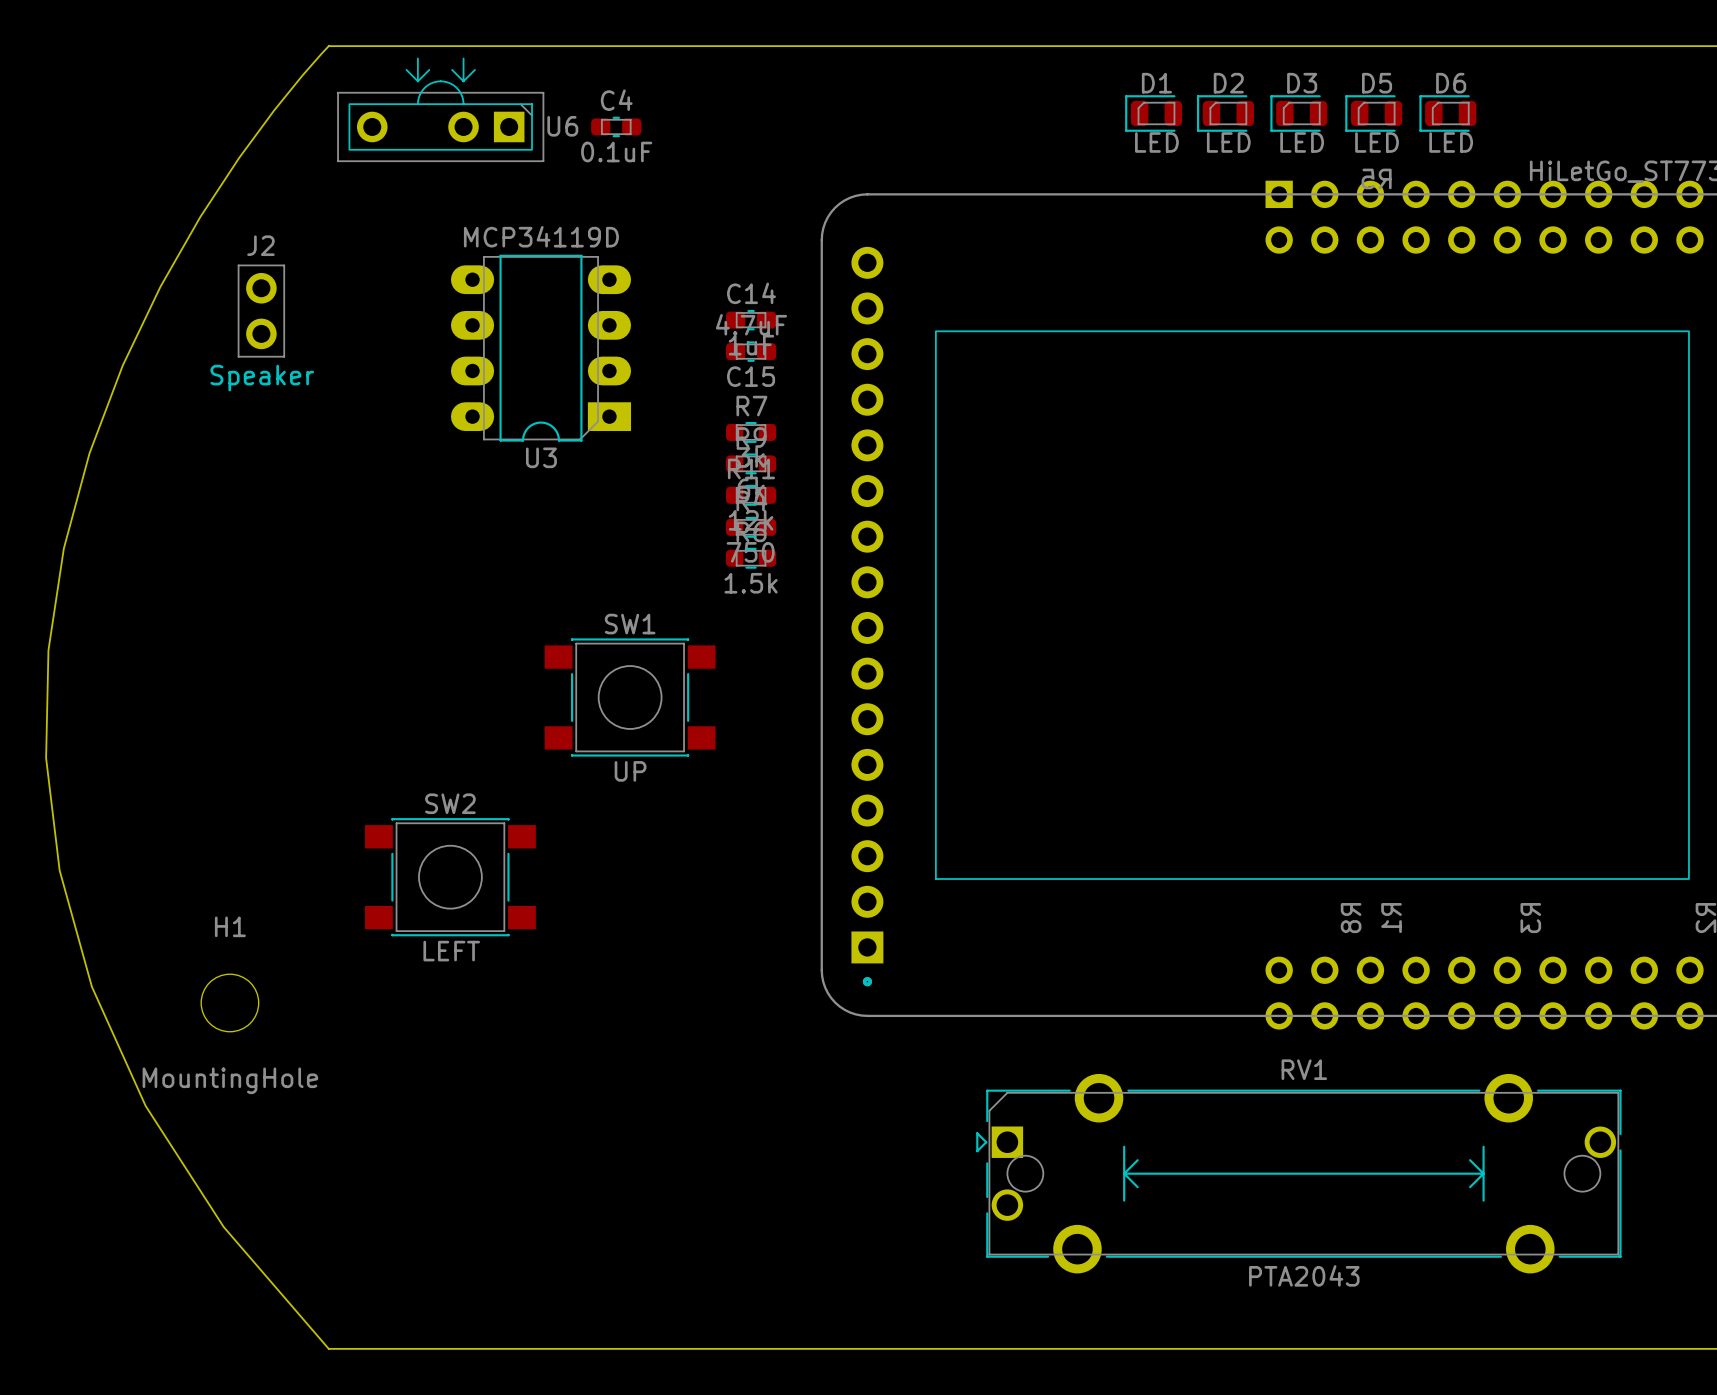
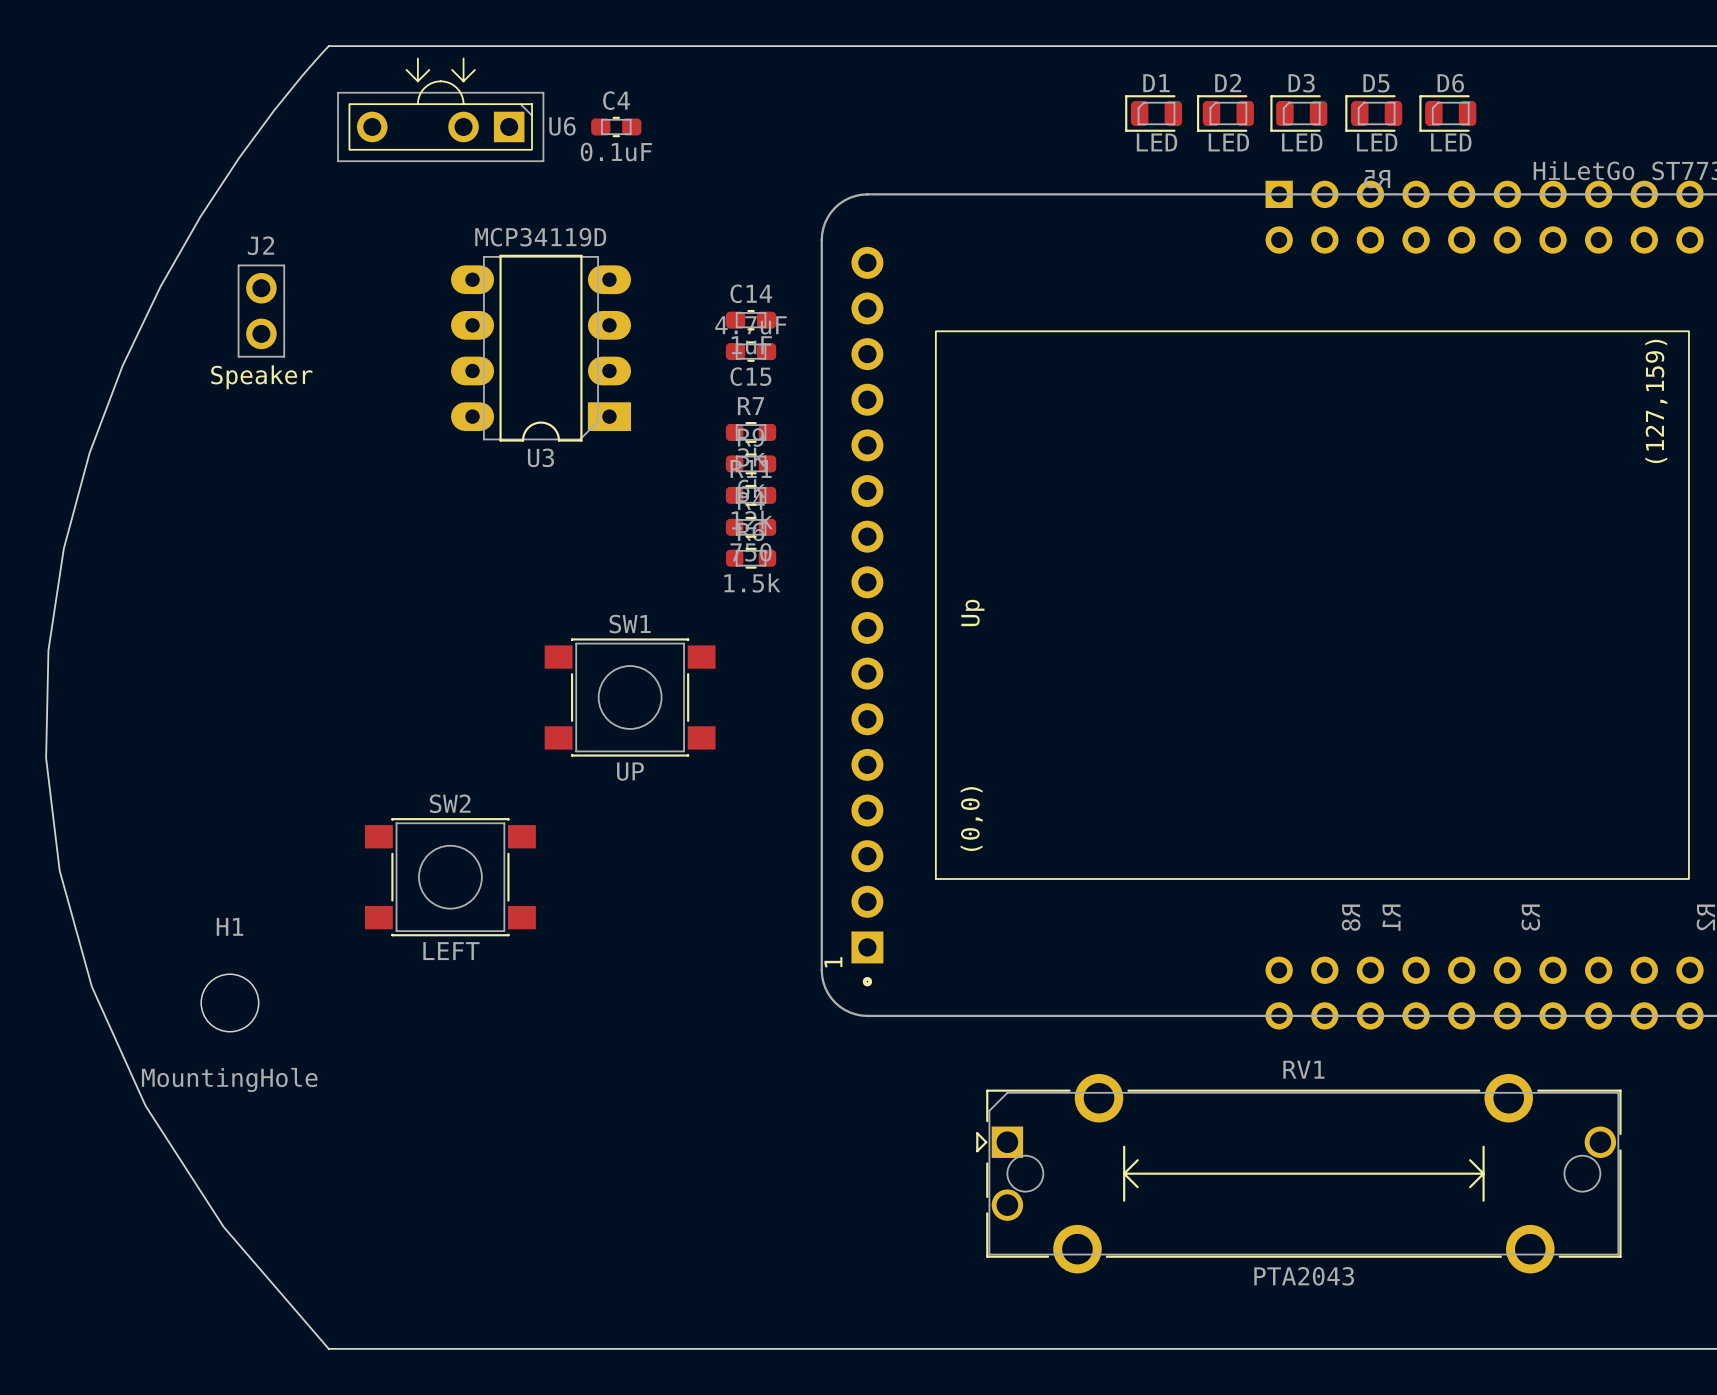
part text: none -> (127,159) (1656, 401)
part text: none -> Up (972, 612)
part text: none -> (0,0) (971, 819)
part text: none -> 1 (833, 962)

